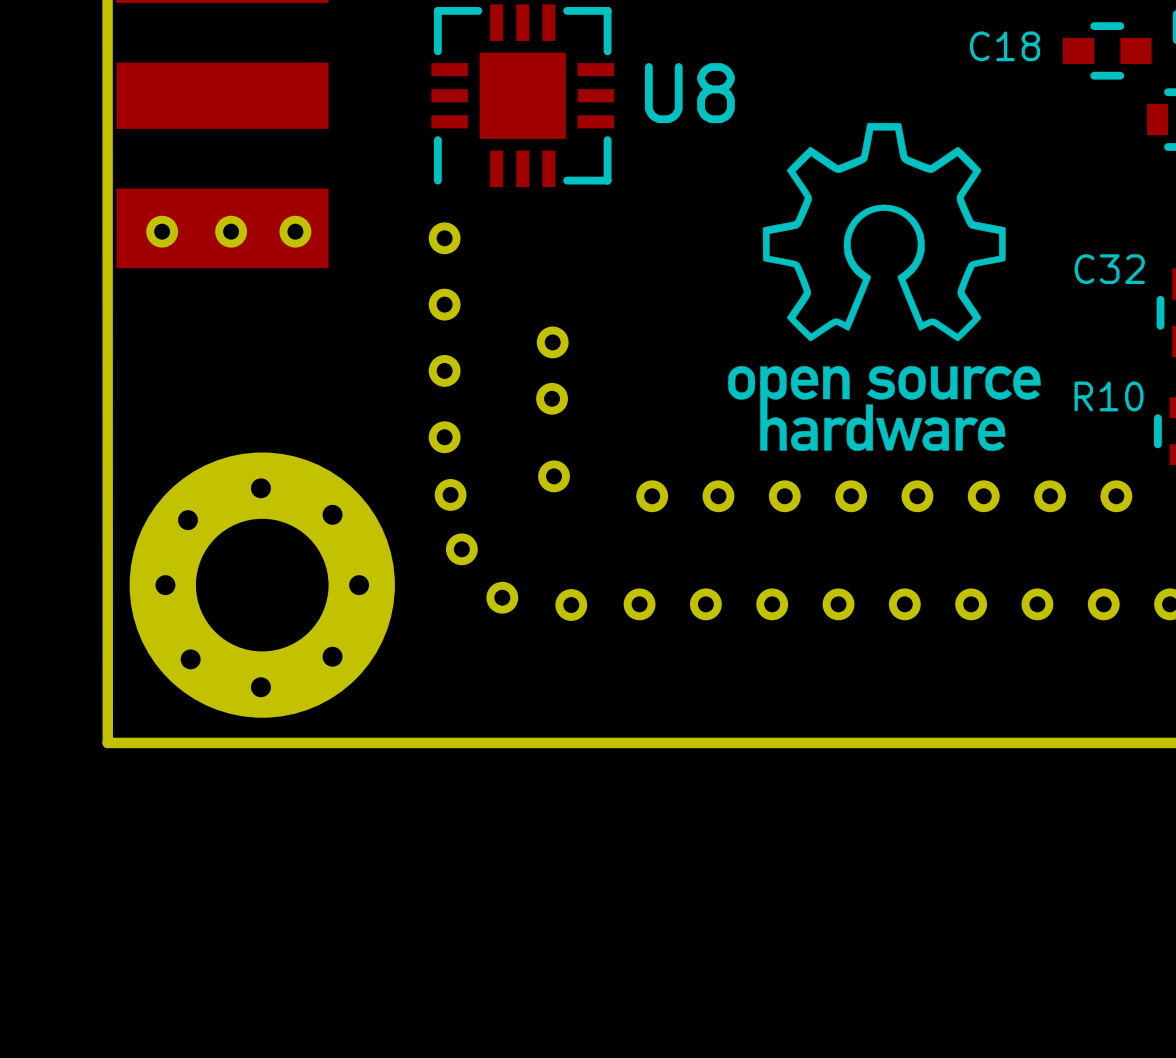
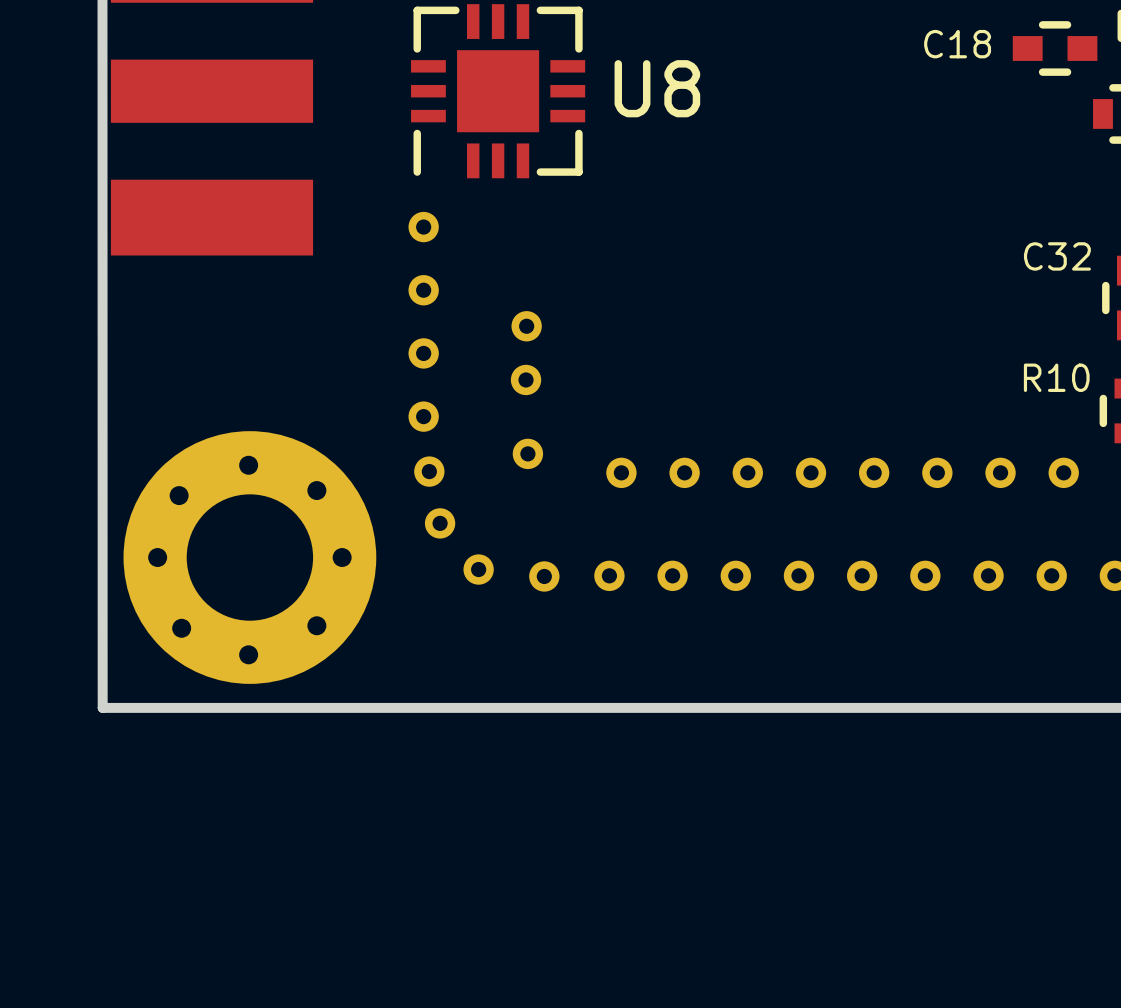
drawing: [728, 122, 1041, 451] -> none
part: (162, 231) -> none
part: (231, 231) -> none
part: (295, 231) -> none

